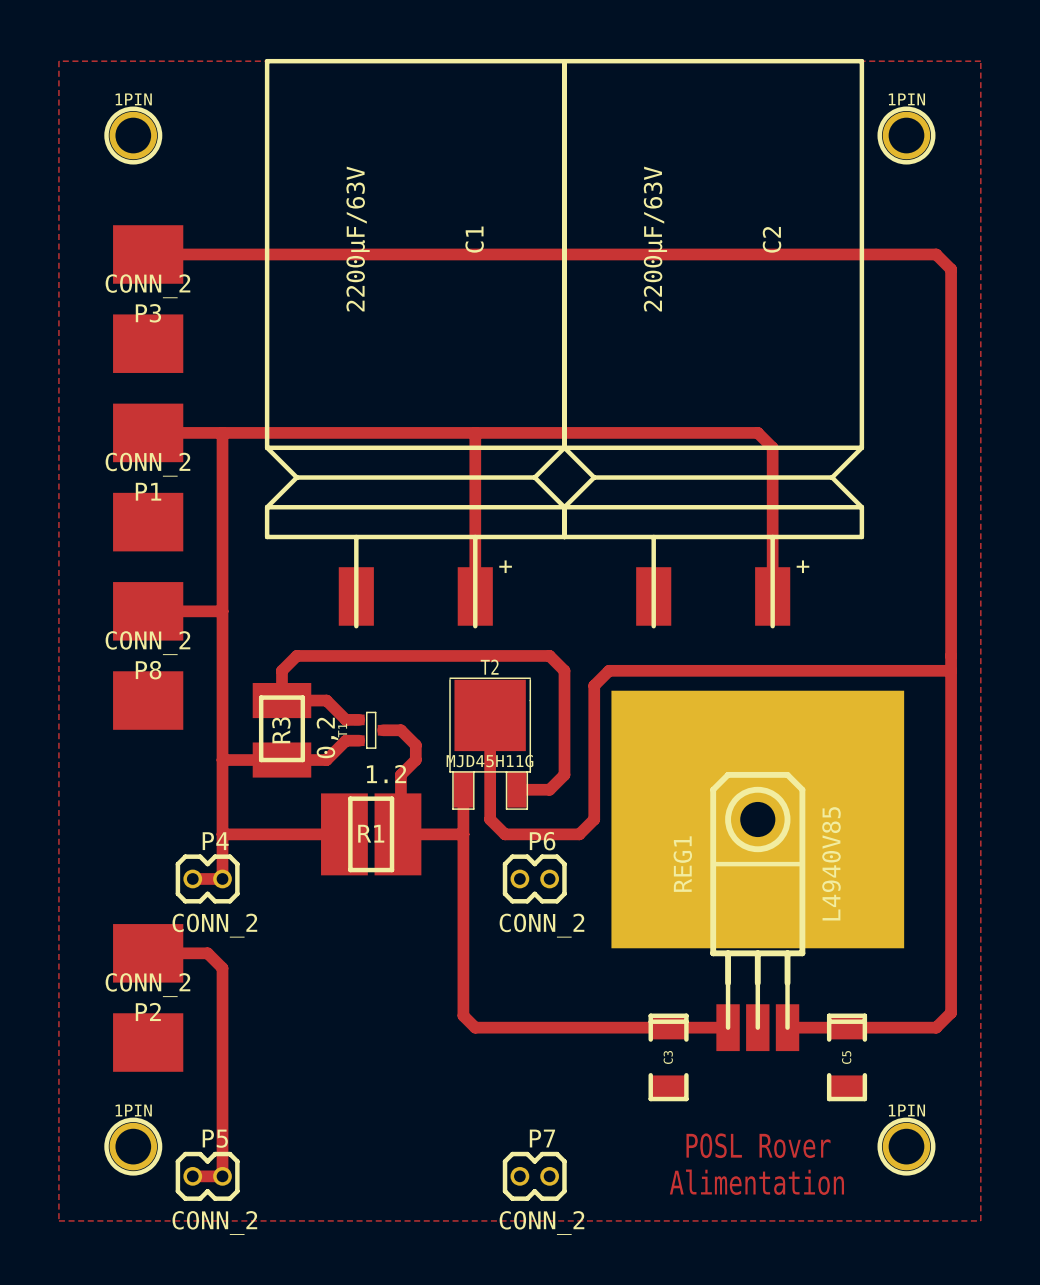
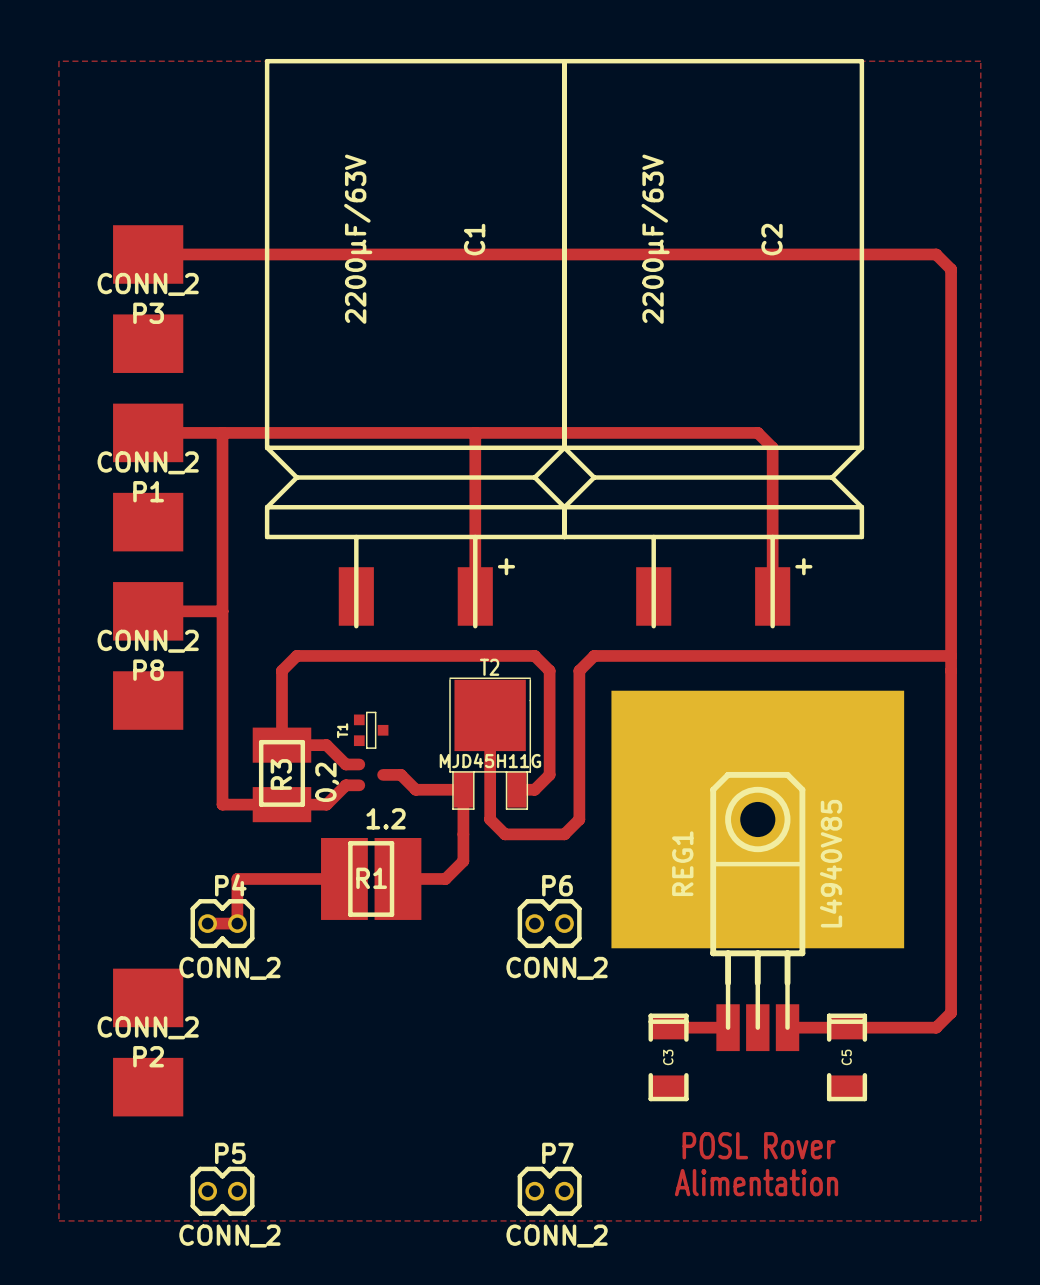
1PIN: (133, 135) -> none
1PIN: (906, 135) -> none
track: (534, 655) (549, 655) (564, 670) (564, 774) (549, 789) (534, 789) -> (534, 655) (549, 670) (549, 774) (534, 789)
track: (951, 670) (609, 670) (594, 685) (594, 819) (579, 834) (564, 834) -> (951, 655) (594, 655) (579, 670) (579, 819) (564, 834)
track: (281, 700) (326, 700) (345, 719) (359, 719) -> (281, 700) (281, 745) (326, 745) (345, 764) (359, 764)
R3 position: (281, 730) -> (281, 774)
track: (383, 730) (400, 730) (415, 745) (415, 760) (400, 774) (400, 831) (397, 834) (463, 834) -> none
track: (359, 740) (345, 740) (326, 760) (222, 760) -> none
track: none -> (383, 774) (400, 774) (415, 789) (463, 789)
track: (222, 804) (222, 878) (192, 878) -> (222, 804) (326, 804) (345, 785) (359, 785)
track: (222, 834) (344, 834) -> none
R1 position: (371, 834) -> (371, 878)
track: (463, 861) (463, 1015) (475, 1027) (668, 1027) -> (463, 861) (445, 878) (397, 878)
P4 position: (207, 878) -> (222, 923)
track: none -> (344, 878) (237, 878) (237, 923) (207, 923)
P6 position: (534, 878) -> (549, 923)
track: (148, 953) (207, 953) (222, 968) (222, 1176) (192, 1176) -> none
P2 position: (148, 997) -> (148, 1042)
1PIN: (133, 1146) -> none
1PIN: (906, 1146) -> none
P5 position: (207, 1176) -> (222, 1191)
P7 position: (534, 1176) -> (549, 1191)

